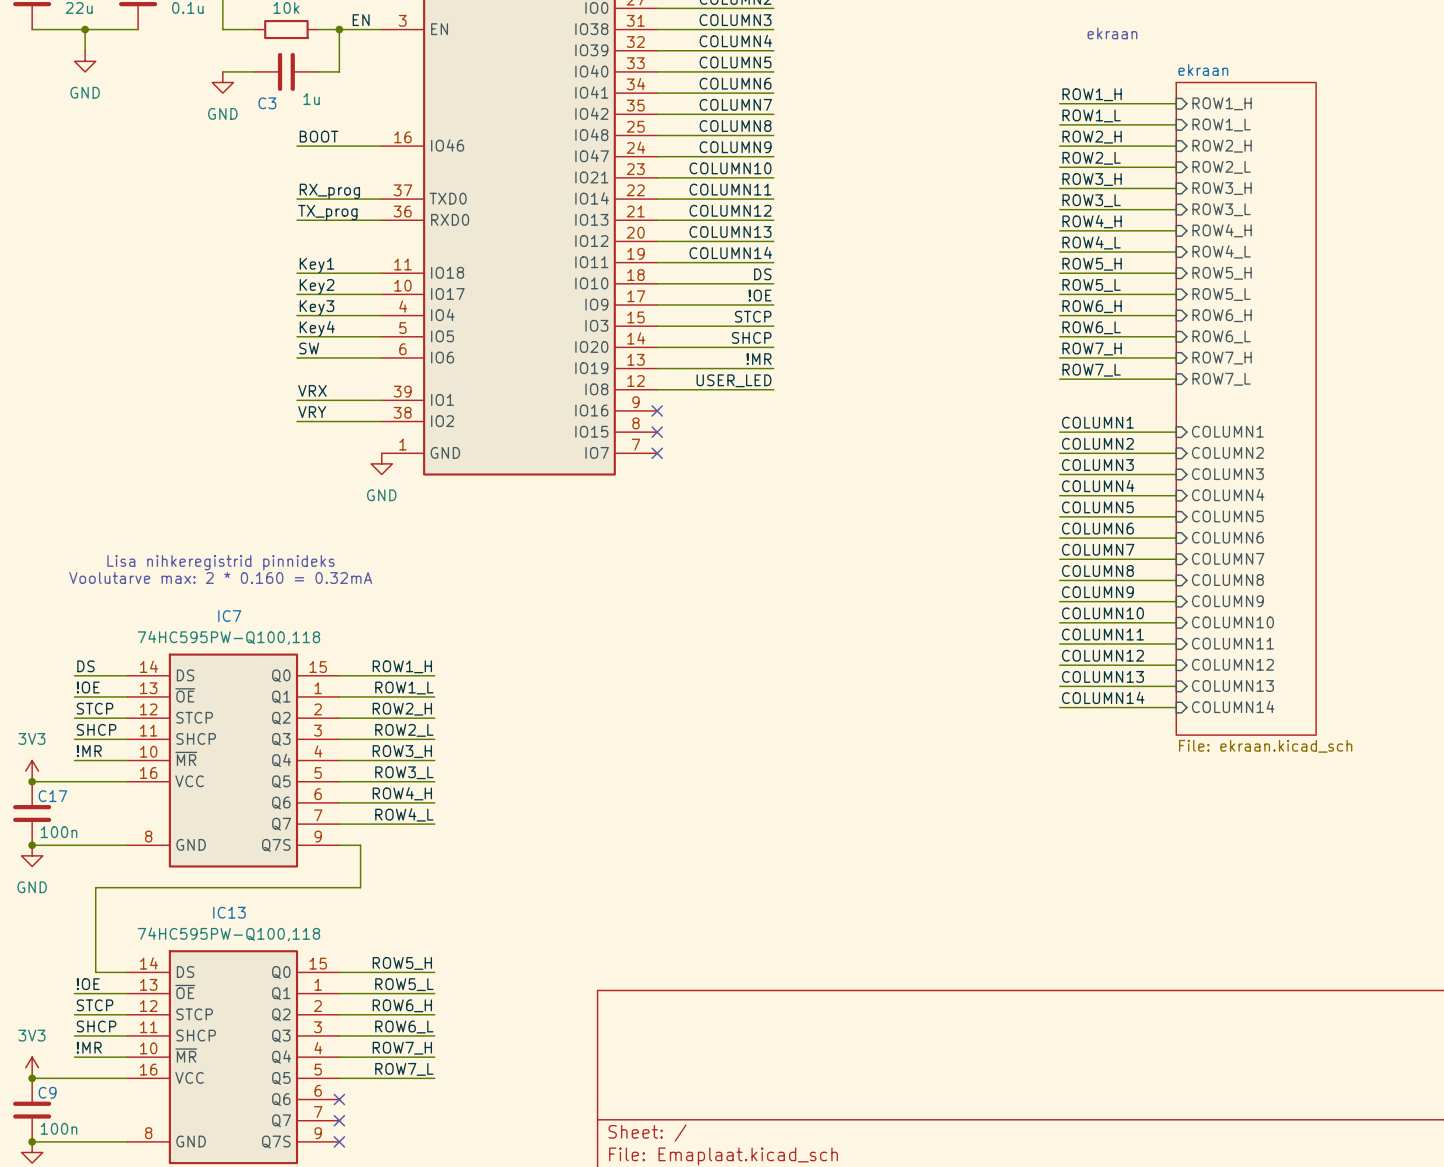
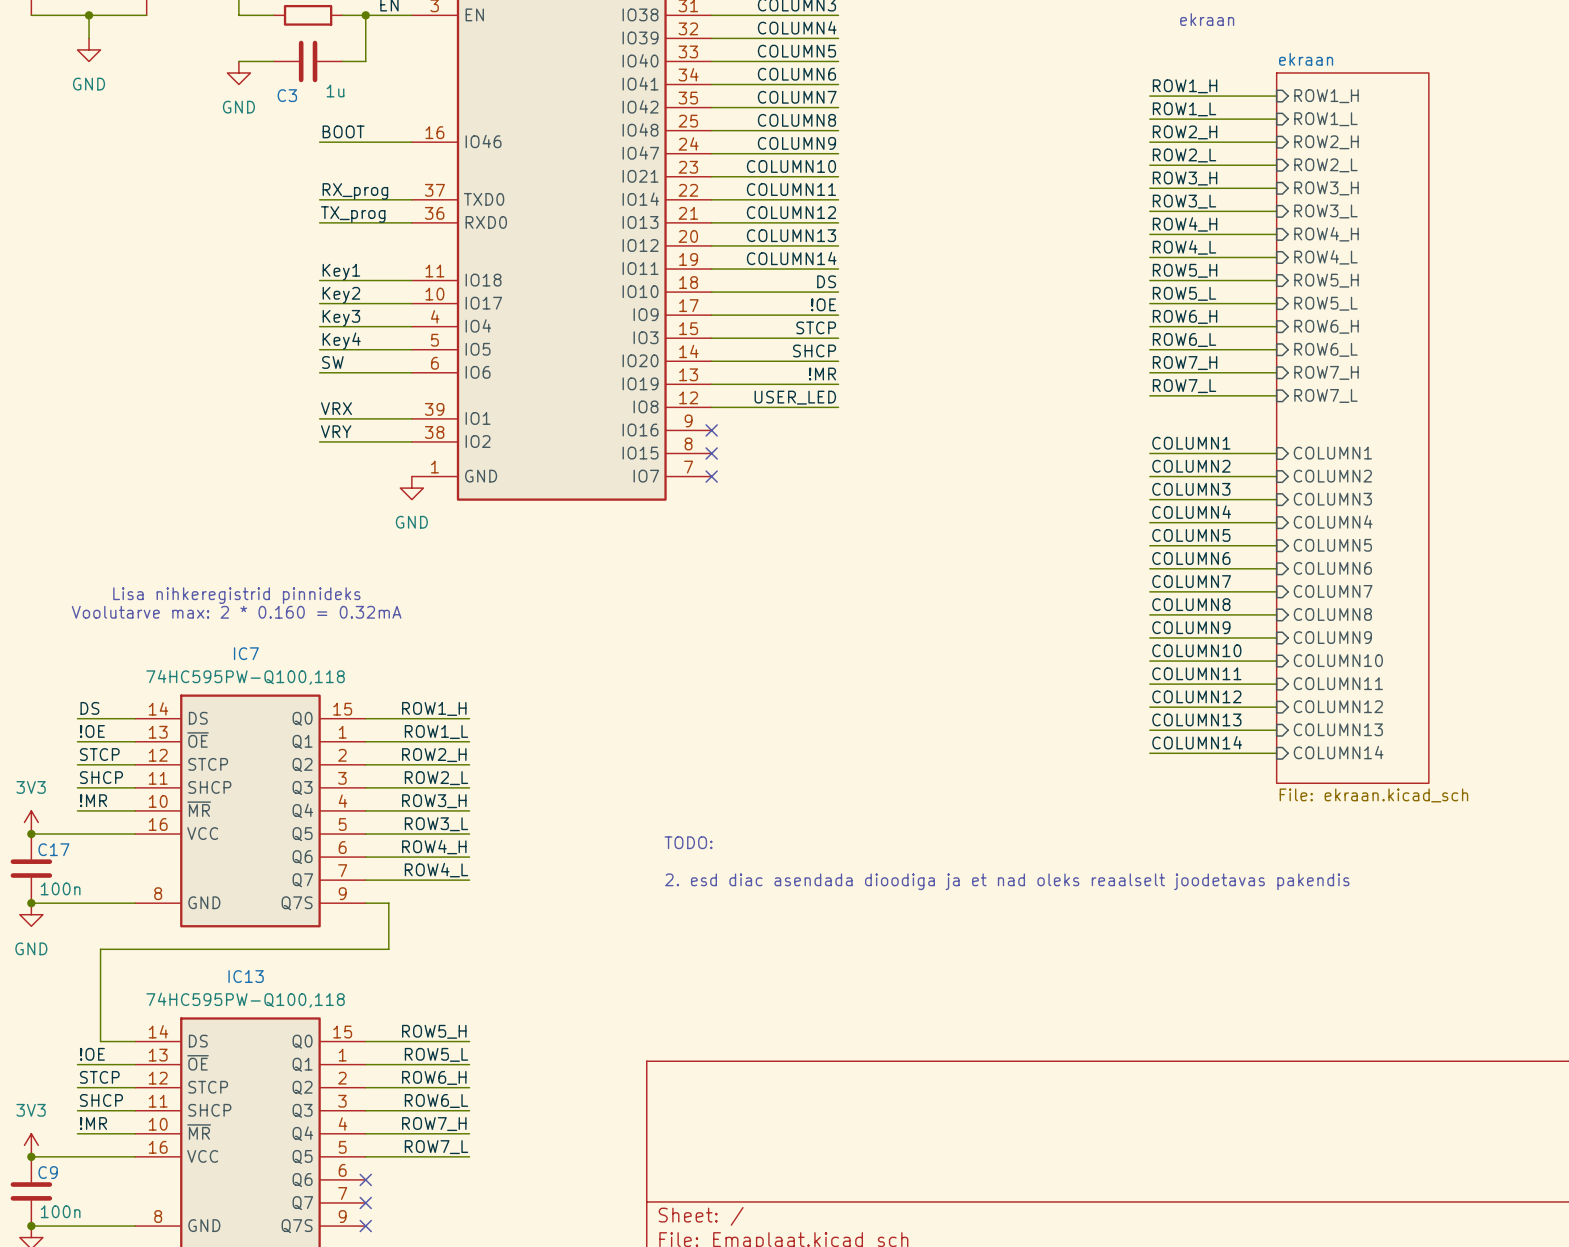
text: none -> TODO: (688, 842)
text: none -> 2. esd diac asendada dioodiga ja et nad oleks reaalselt joodetavas pakendis (1007, 881)

